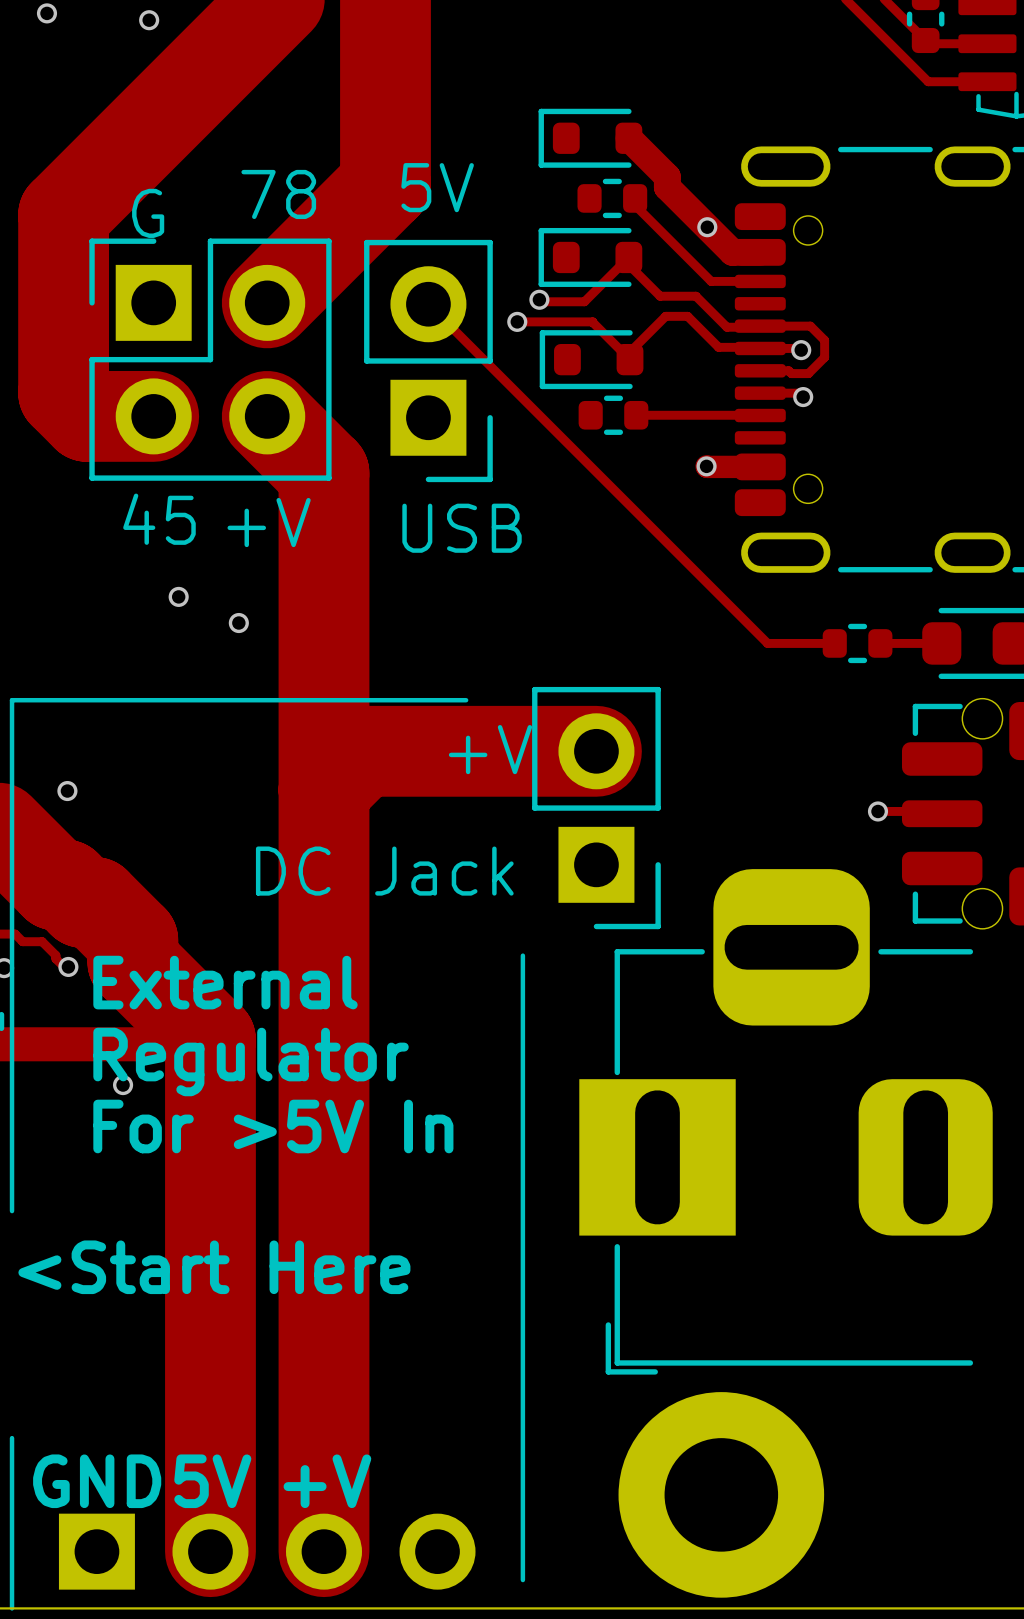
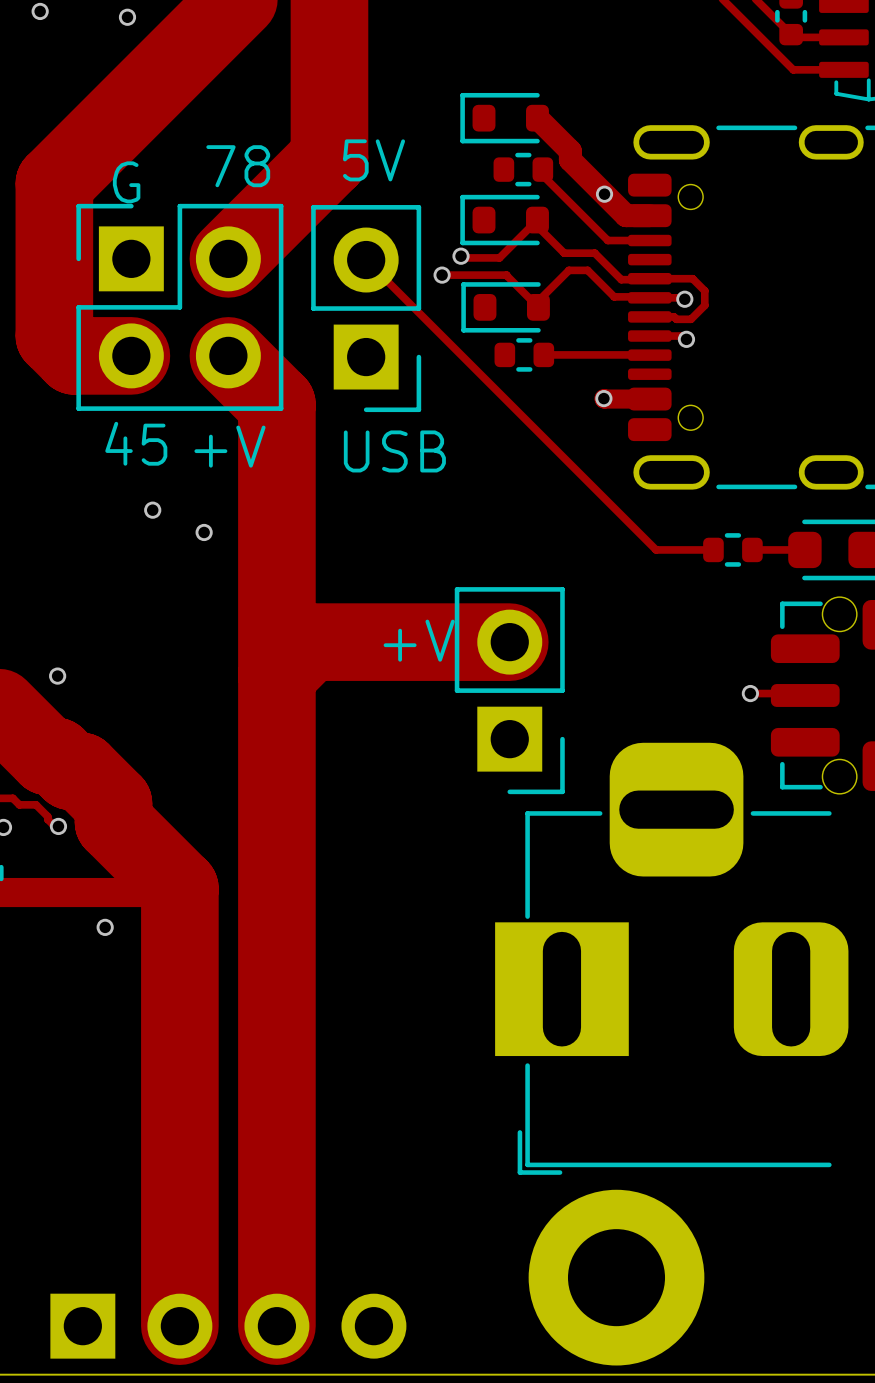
line: (466, 700) (12, 700) (12, 1211) -> none
text: DC Jack (384, 871) -> none
line: (522, 955) (522, 1580) -> none
text: External (225, 982) -> none
text: Regulator (251, 1061) -> none
text: For >5V In (273, 1126) -> none
text: <Start Here (214, 1267) -> none
line: (12, 1438) (12, 1608) -> none
text: GND (97, 1481) -> none
text: 5V (212, 1481) -> none
text: +V (327, 1481) -> none

